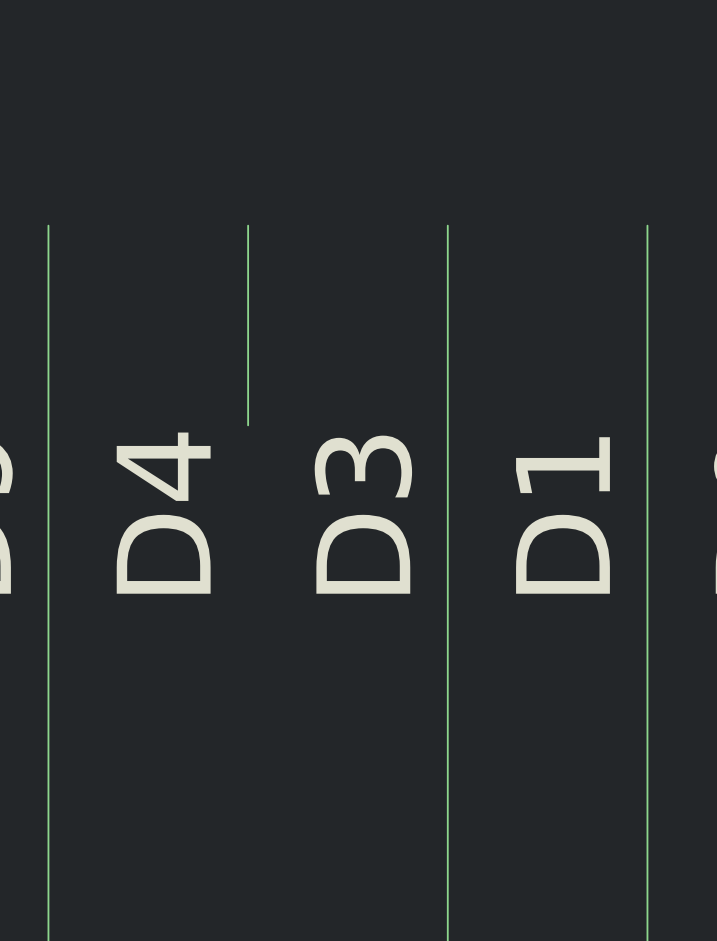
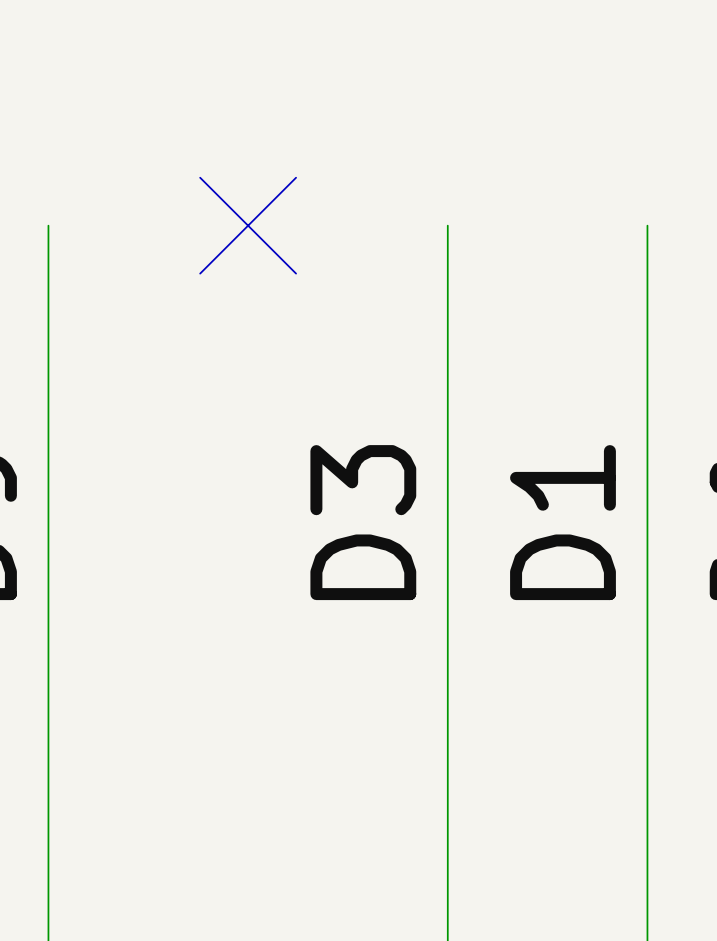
wire: (248, 225) (248, 425) -> none
no-connect mark: none -> (248, 225)
label: D4 (163, 513) -> none

